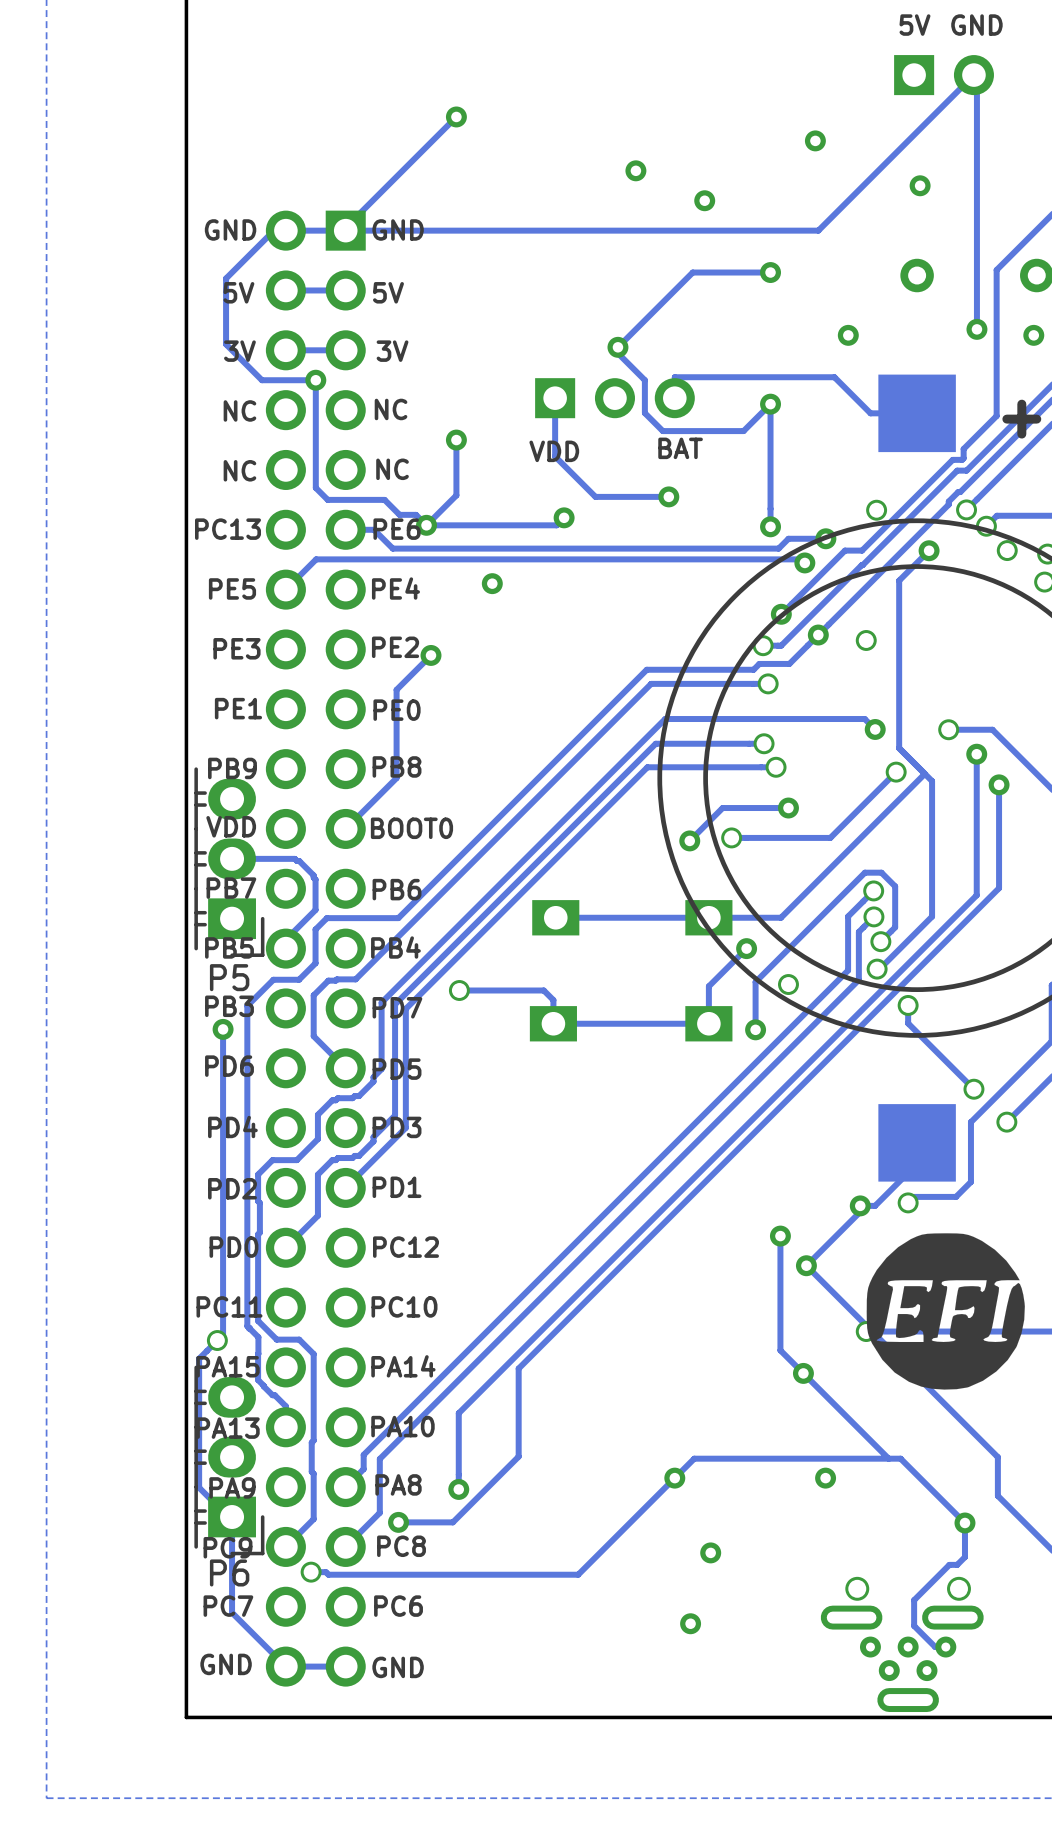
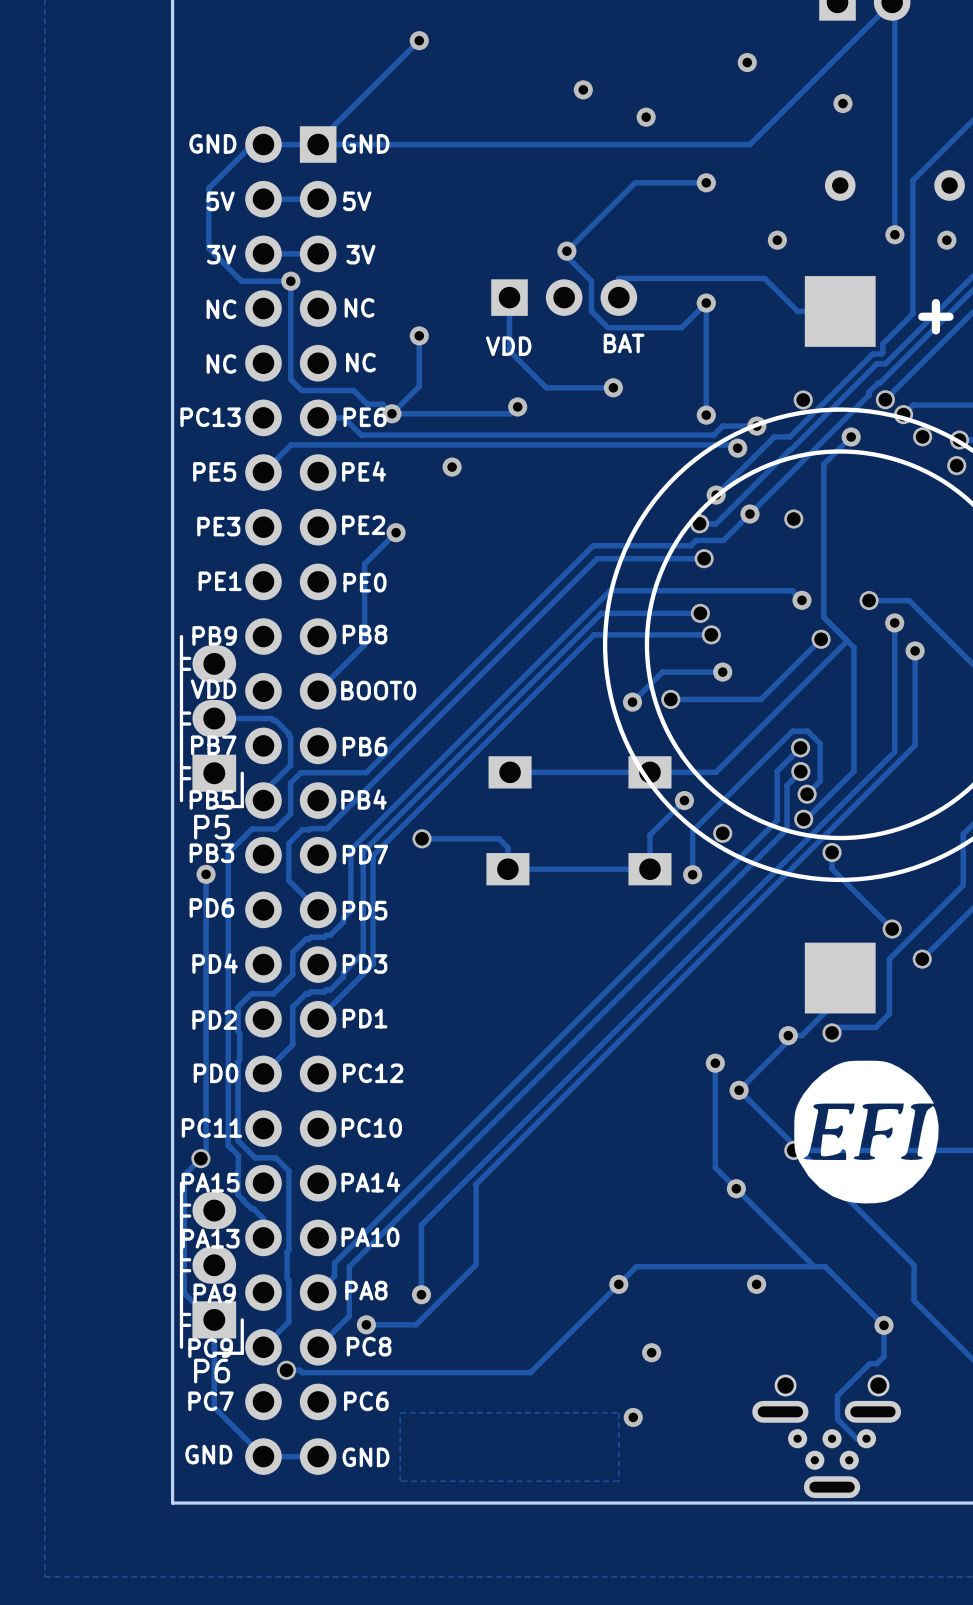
zone outline: none -> (618, 1412) (618, 1481) (400, 1481) (400, 1412) (618, 1412)

